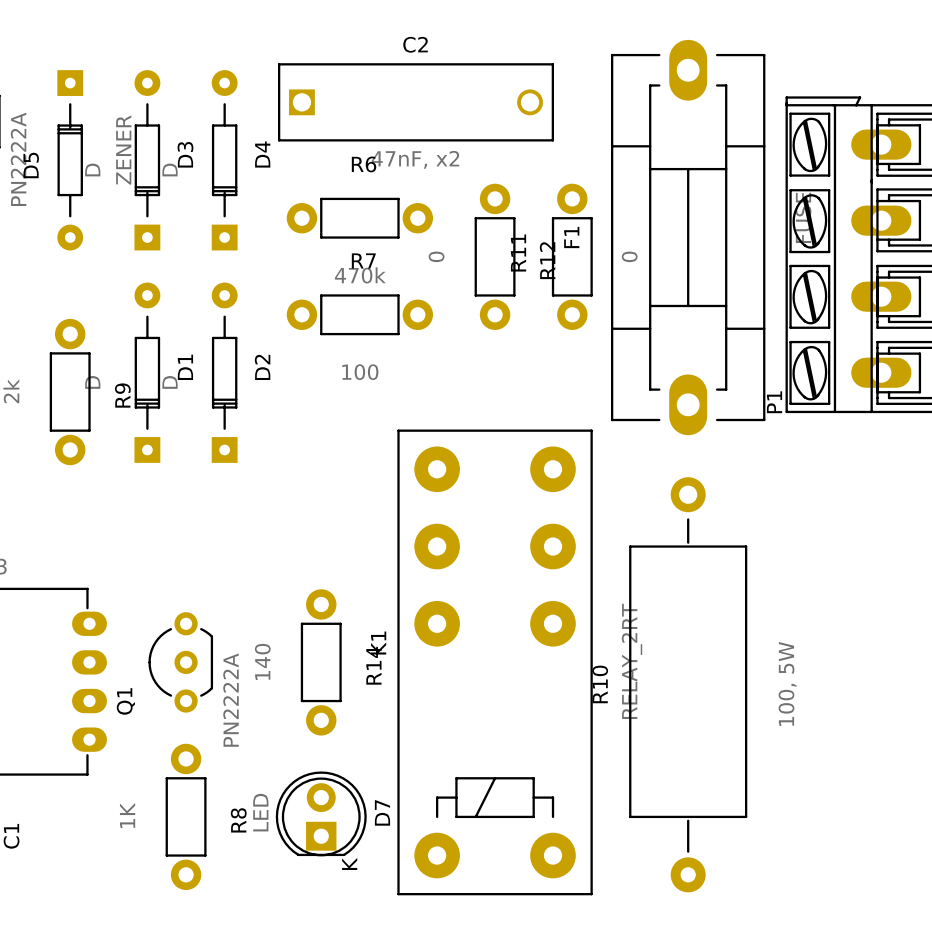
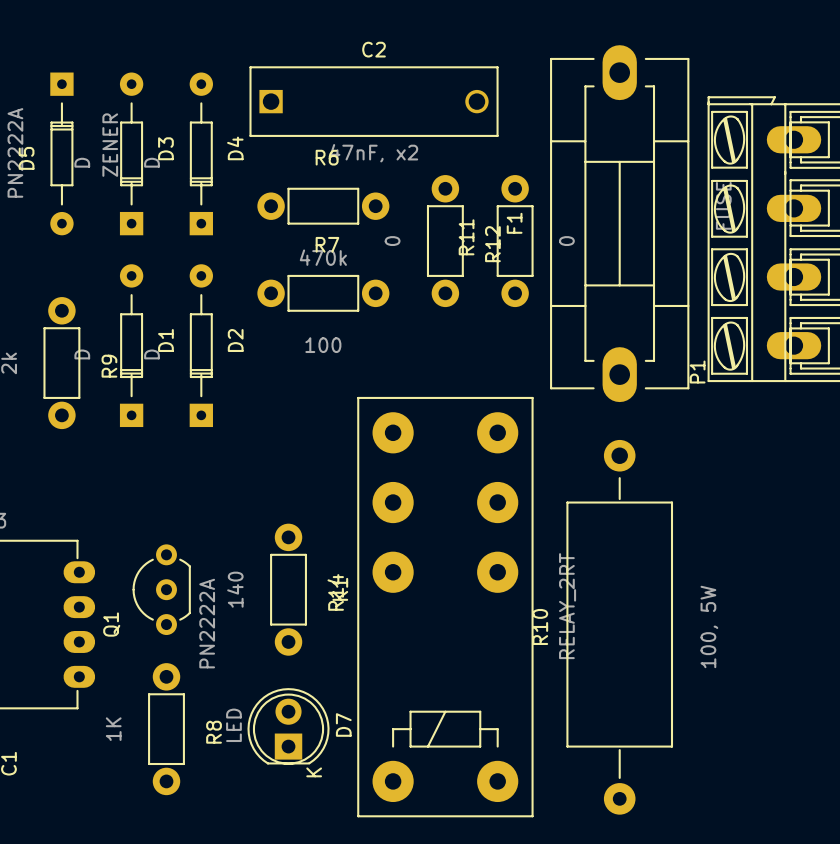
Q1 position: (180, 662) -> (161, 589)
R14 position: (321, 662) -> (288, 589)
D7 position: (321, 813) -> (288, 726)
R8 position: (186, 816) -> (166, 729)

